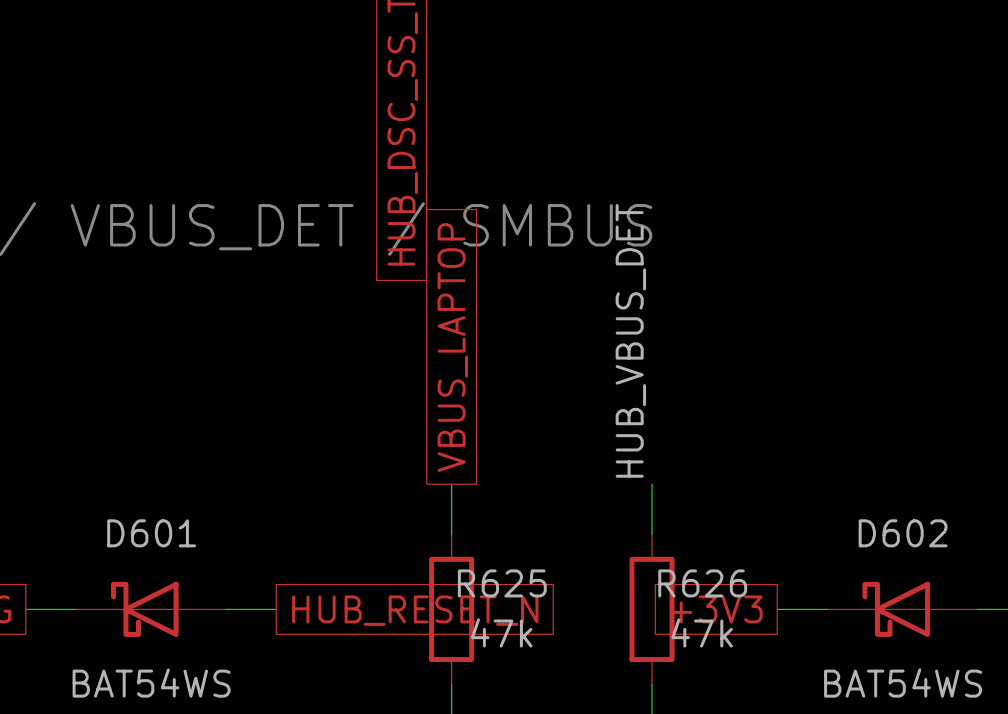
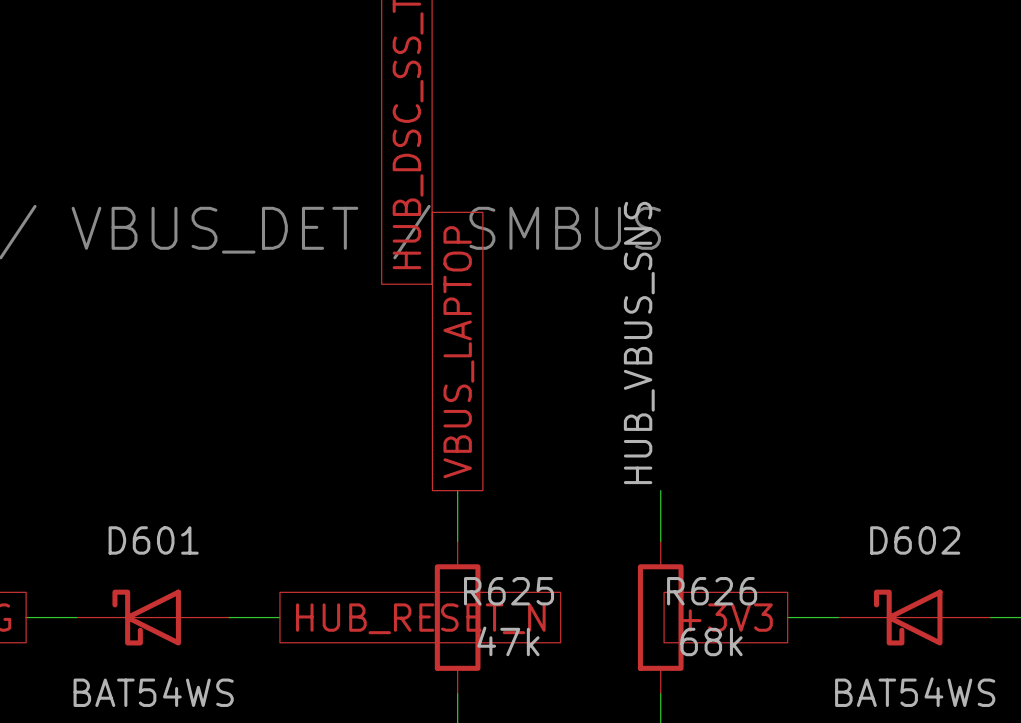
label: HUB_VBUS_DET (630, 340) -> HUB_VBUS_SNS (639, 342)
R626 value: 47k (702, 632) -> 68k (711, 641)

